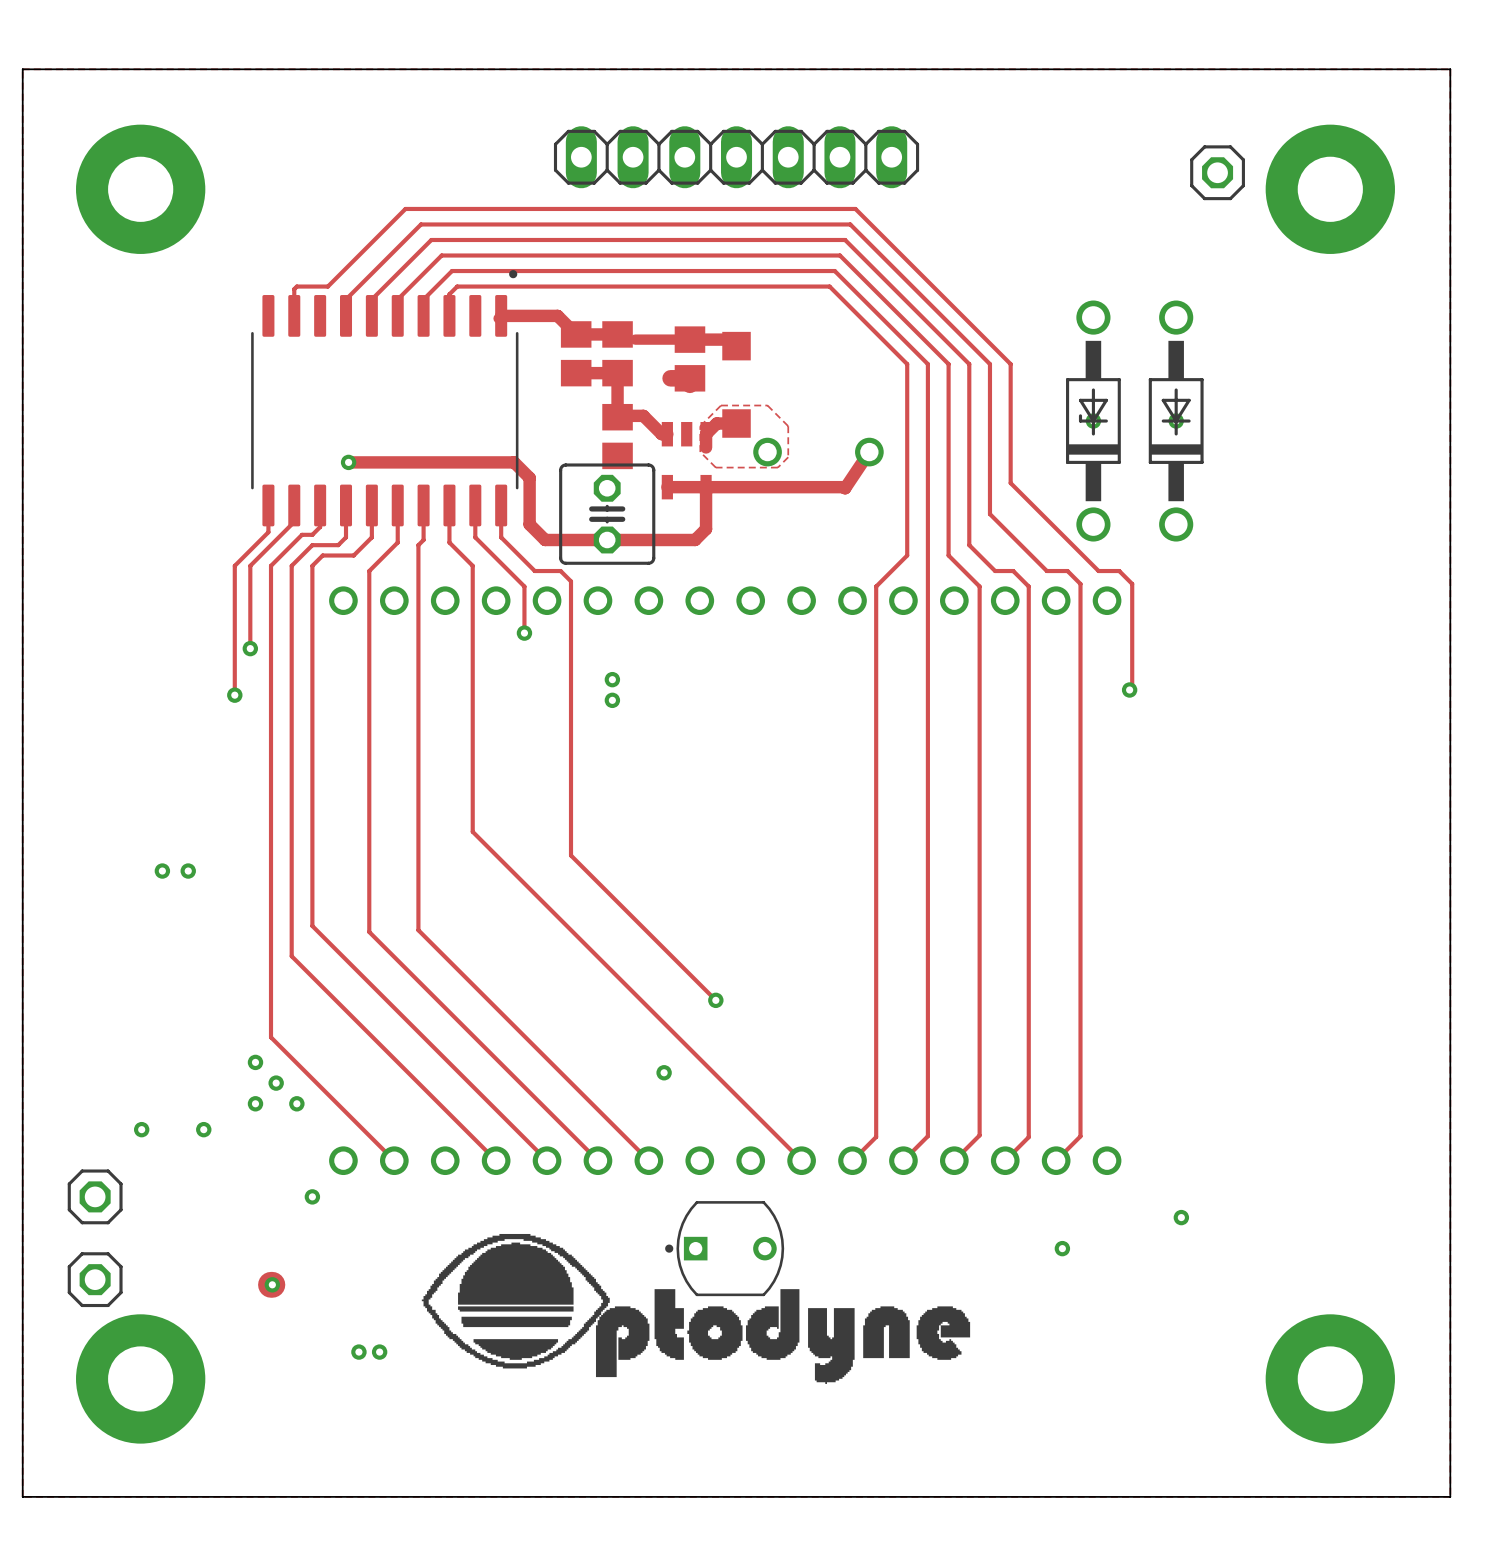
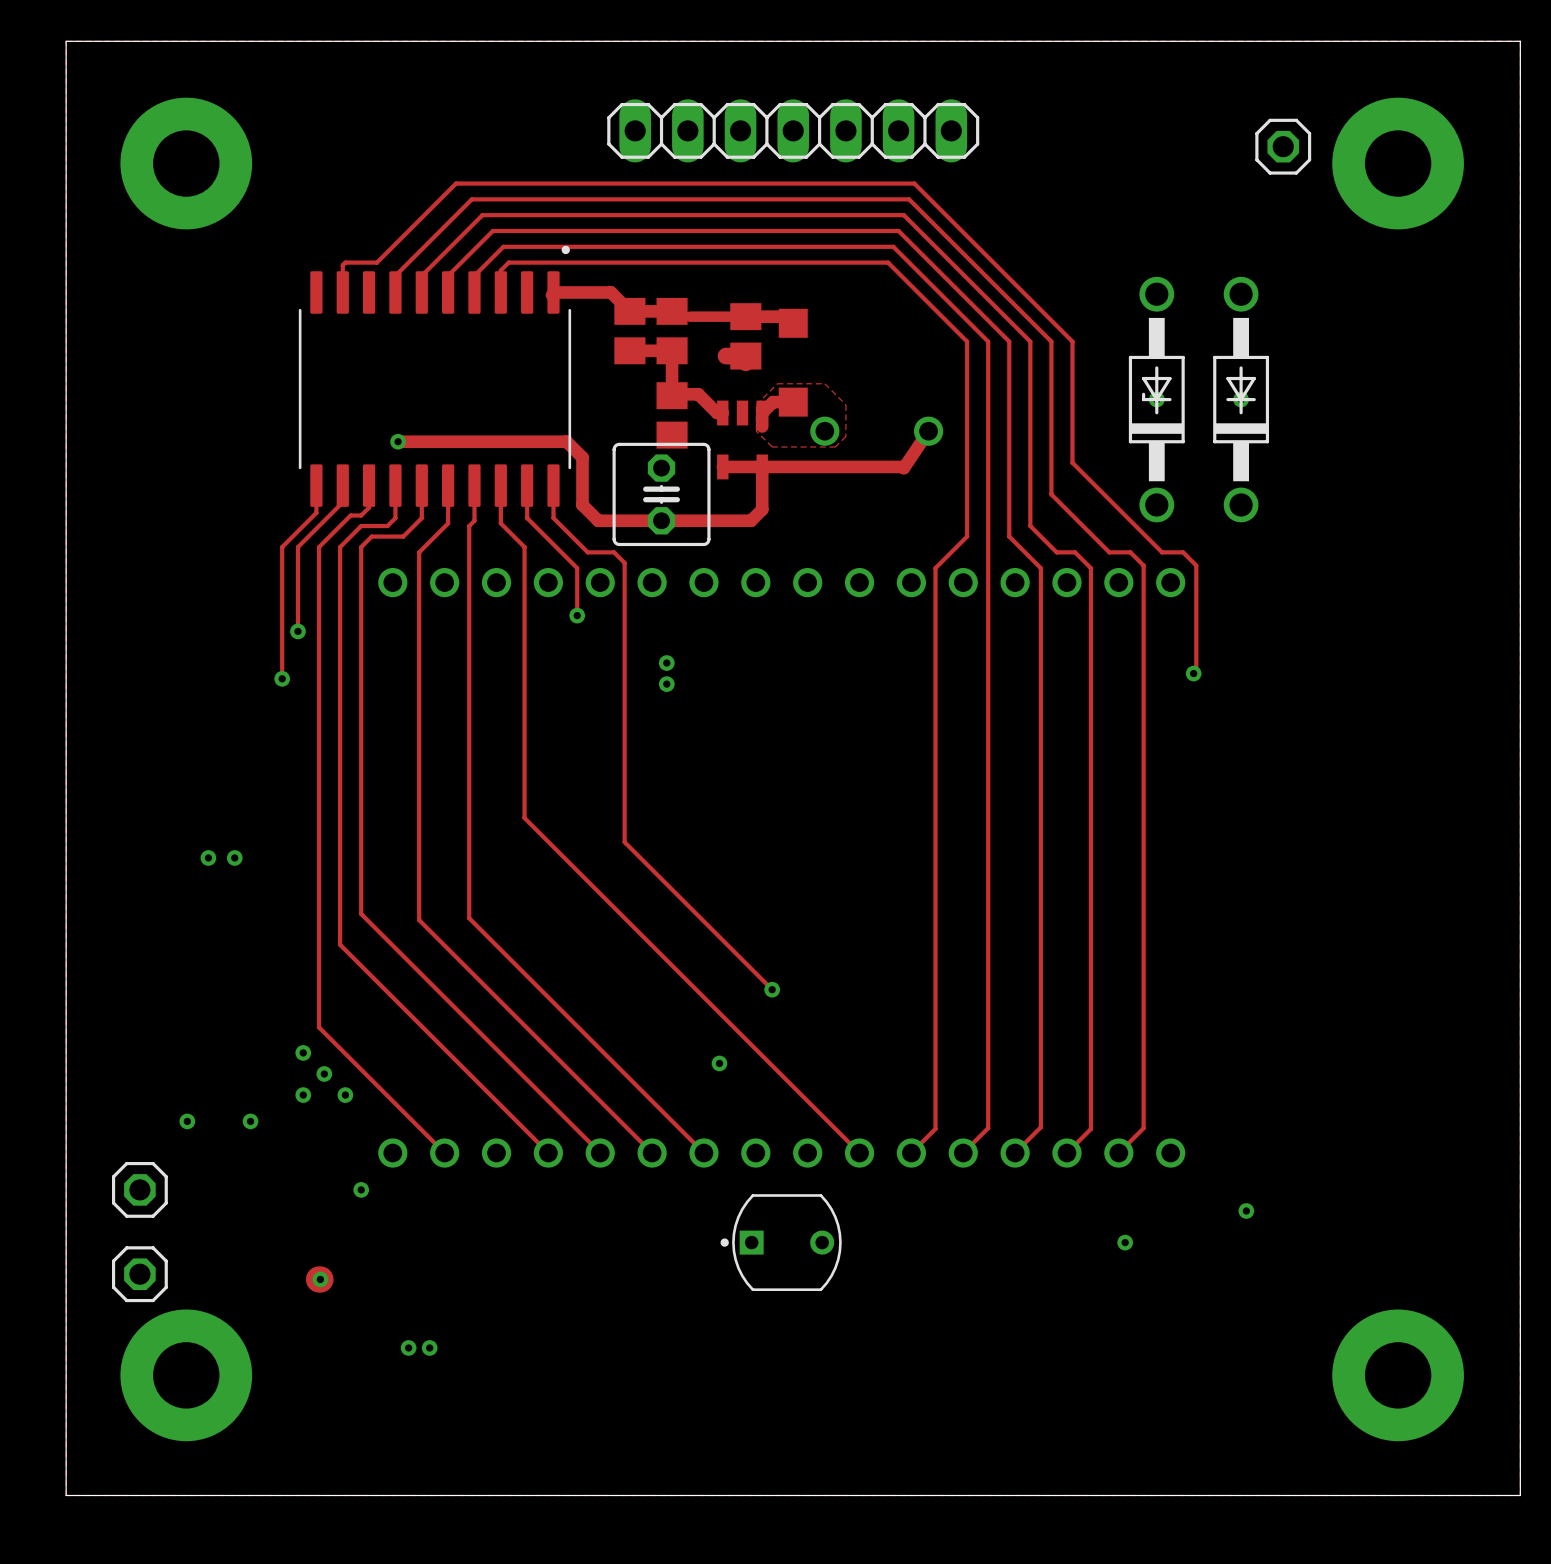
drawing: [421, 1233, 971, 1384] -> none

